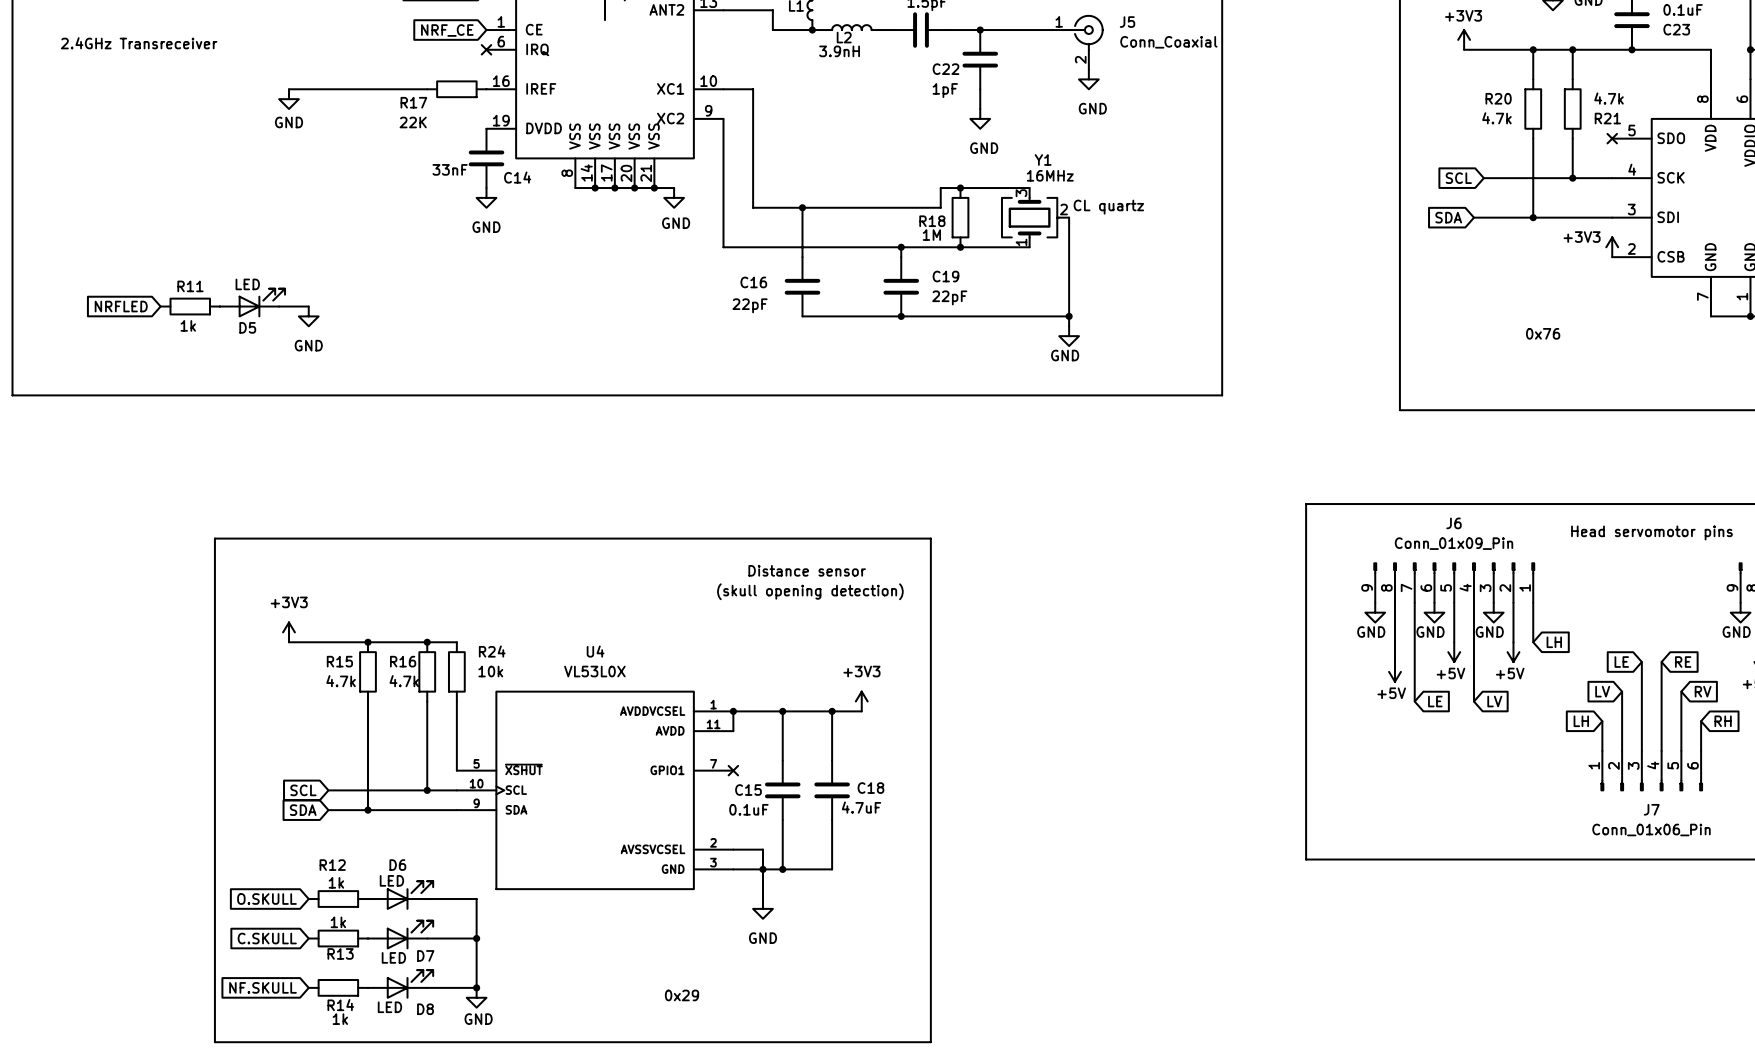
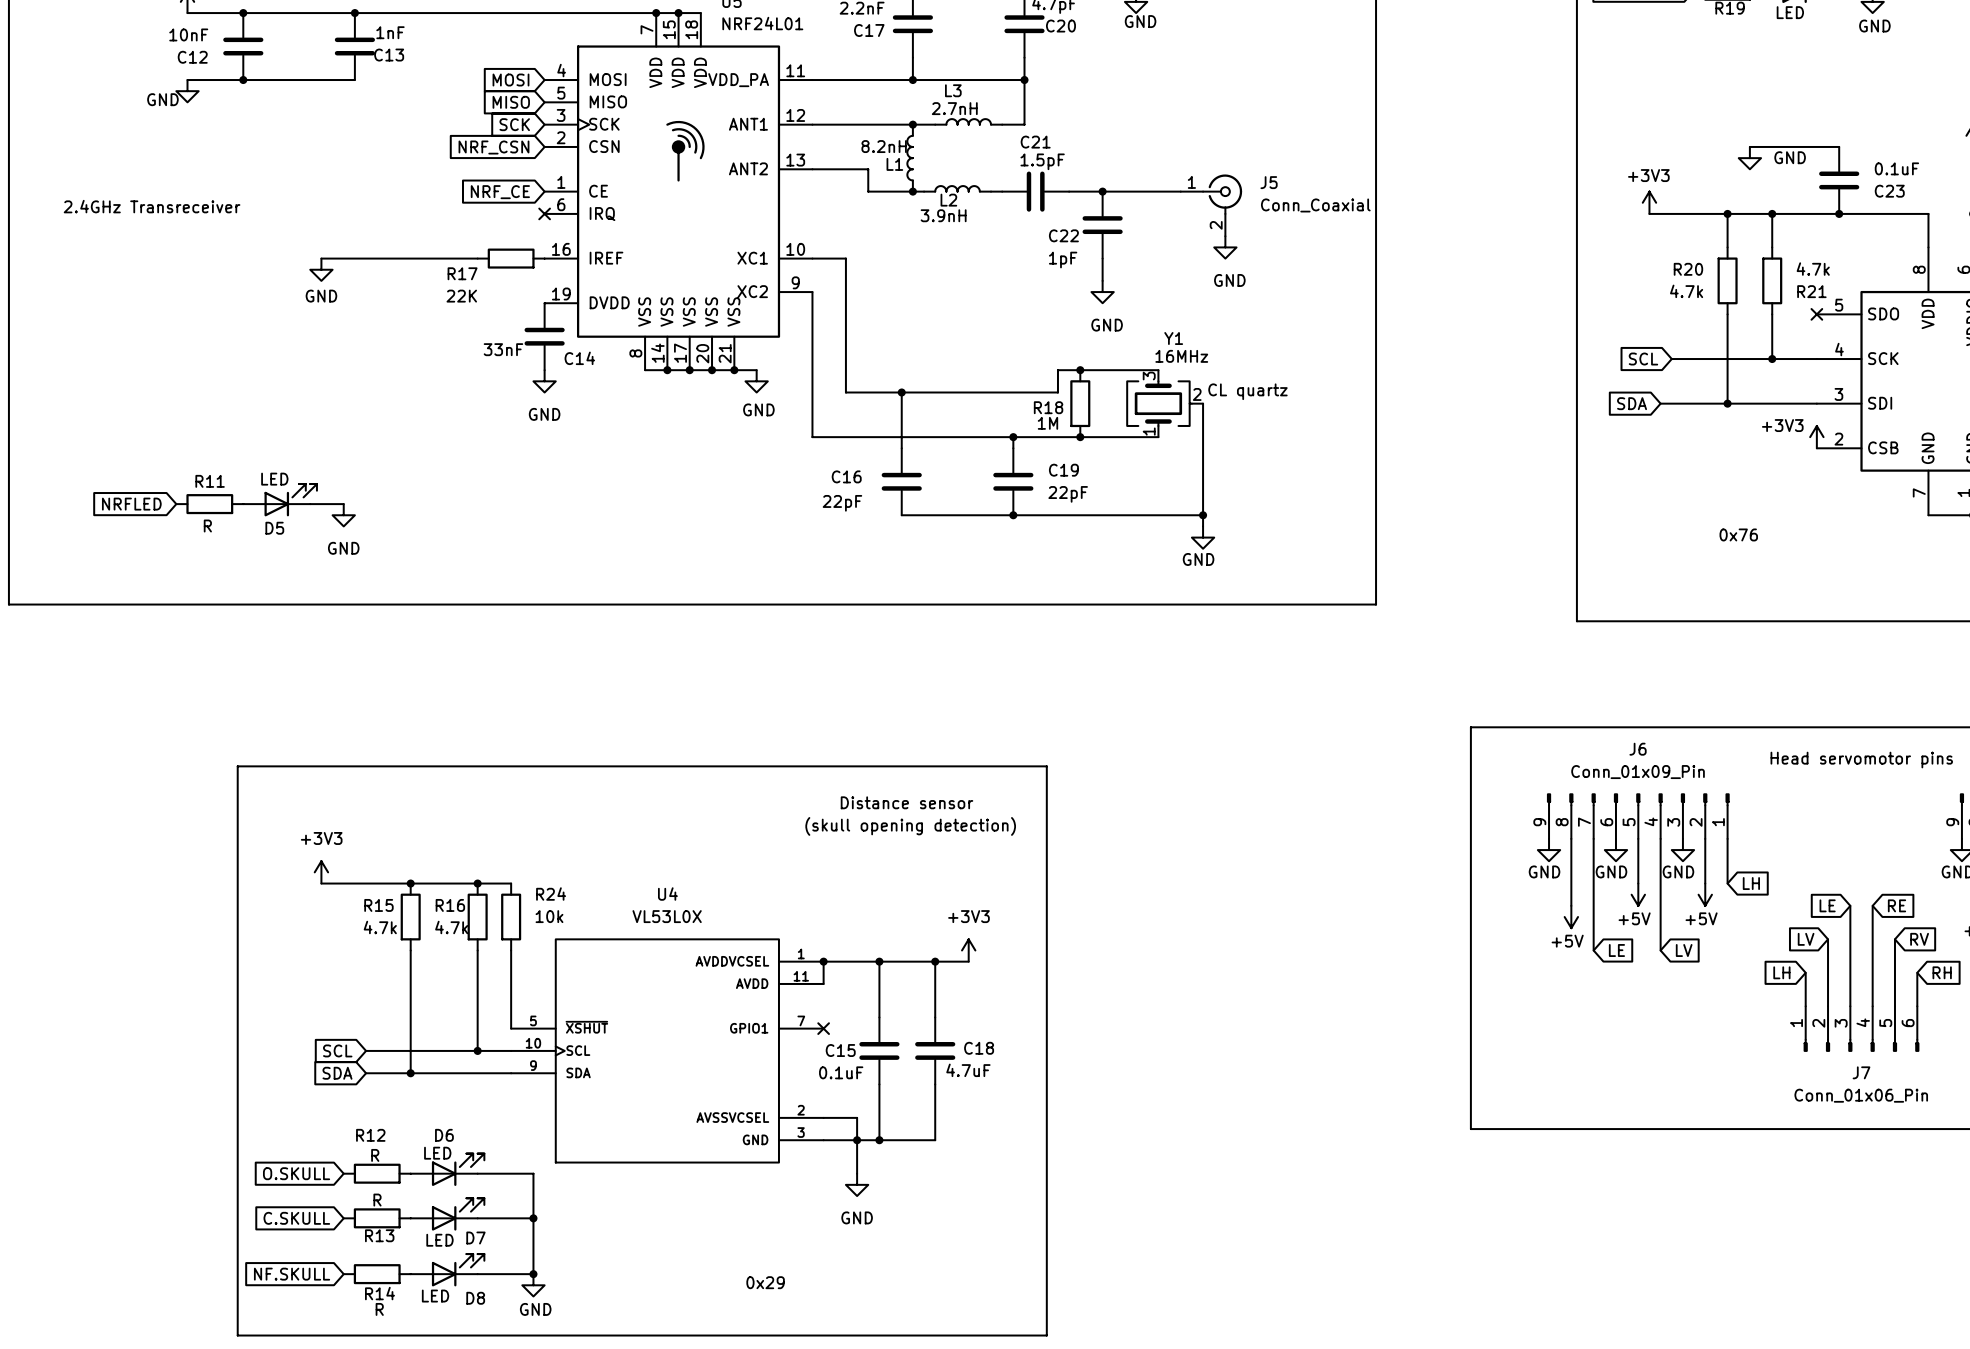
R11 value: 1k (188, 325) -> R (207, 526)
R12 value: 1k (336, 882) -> R (375, 1155)
R13 value: 1k (338, 922) -> R (377, 1200)
R14 value: 1k (340, 1019) -> R (379, 1309)

